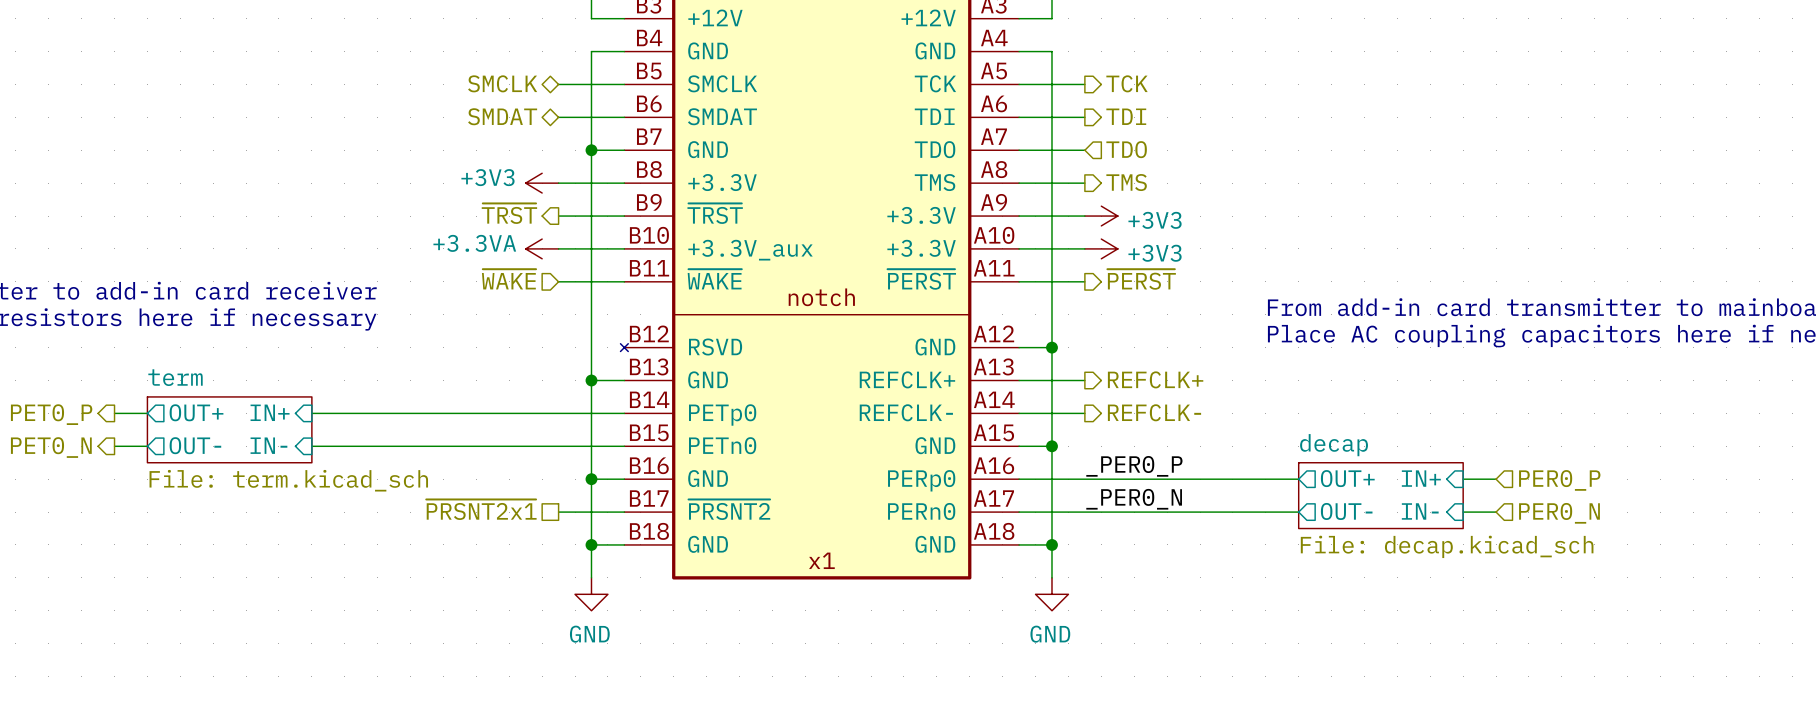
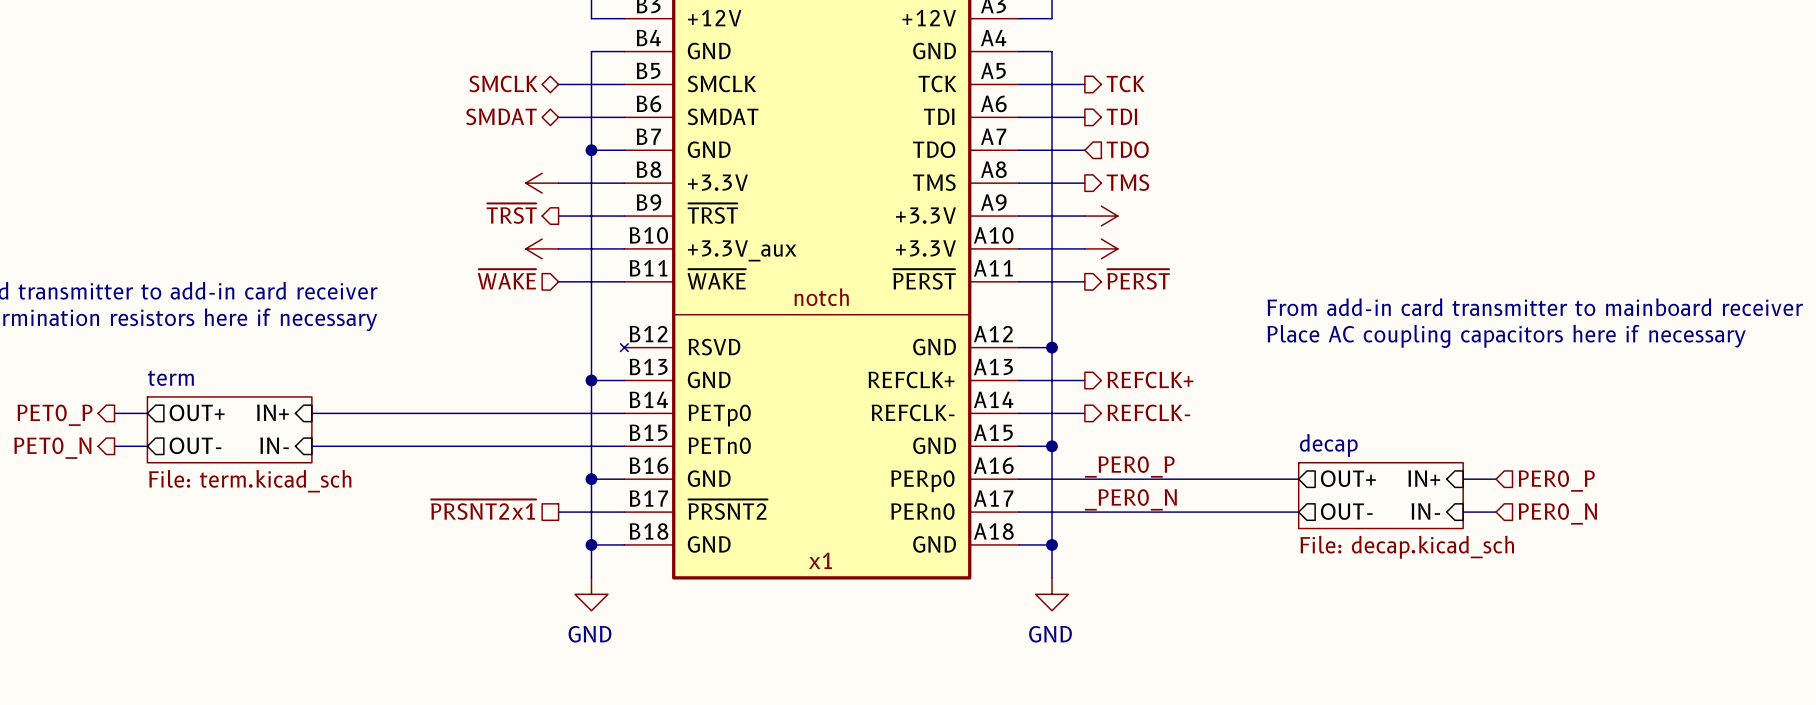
power symbol text: +3V3 (487, 177) -> none
power symbol text: +3V3 (1155, 220) -> none
power symbol text: +3.3VA (474, 243) -> none
power symbol text: +3V3 (1155, 253) -> none

